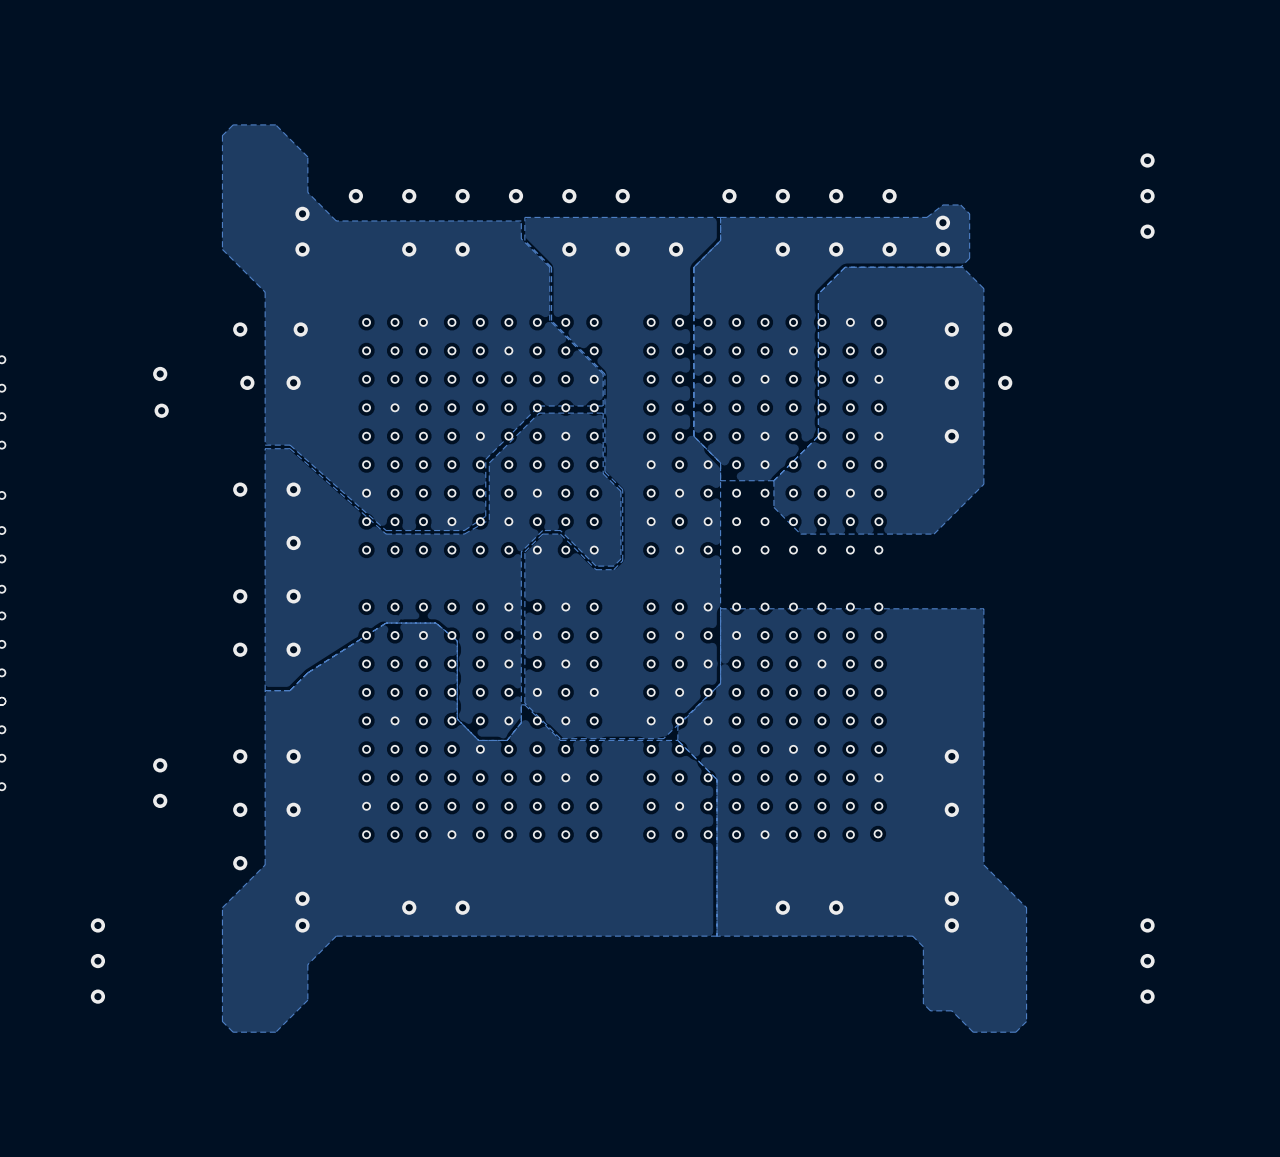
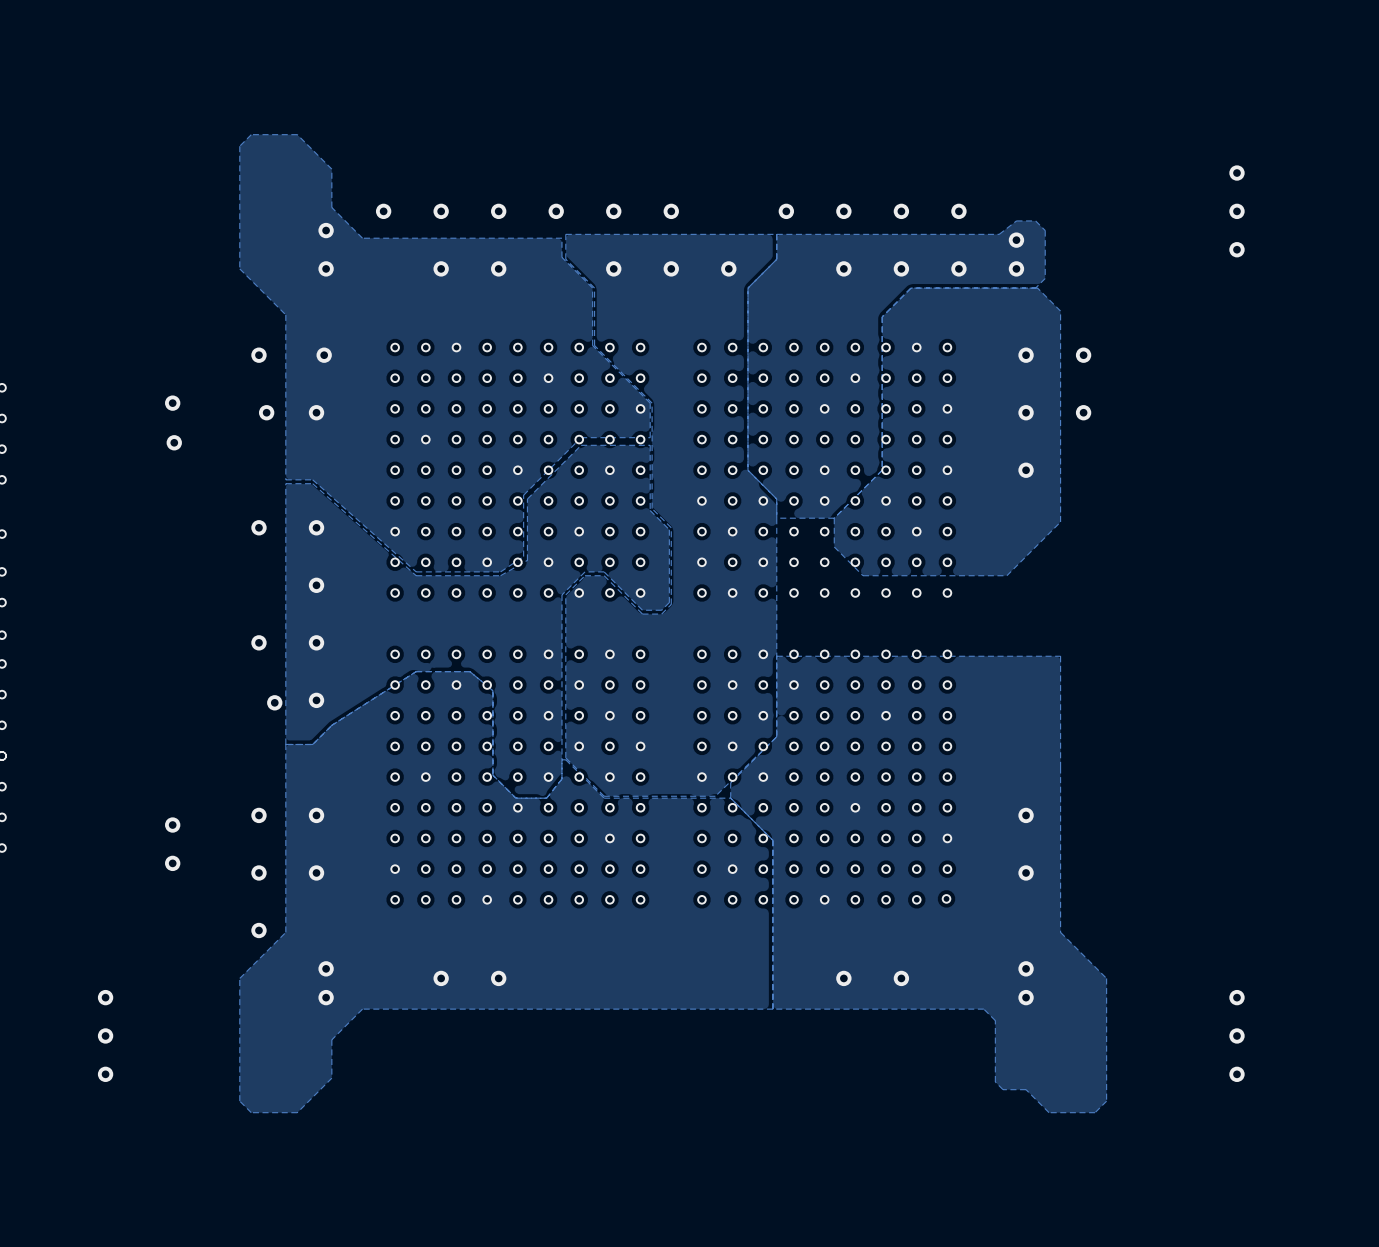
via position: (240, 649) -> (274, 702)

